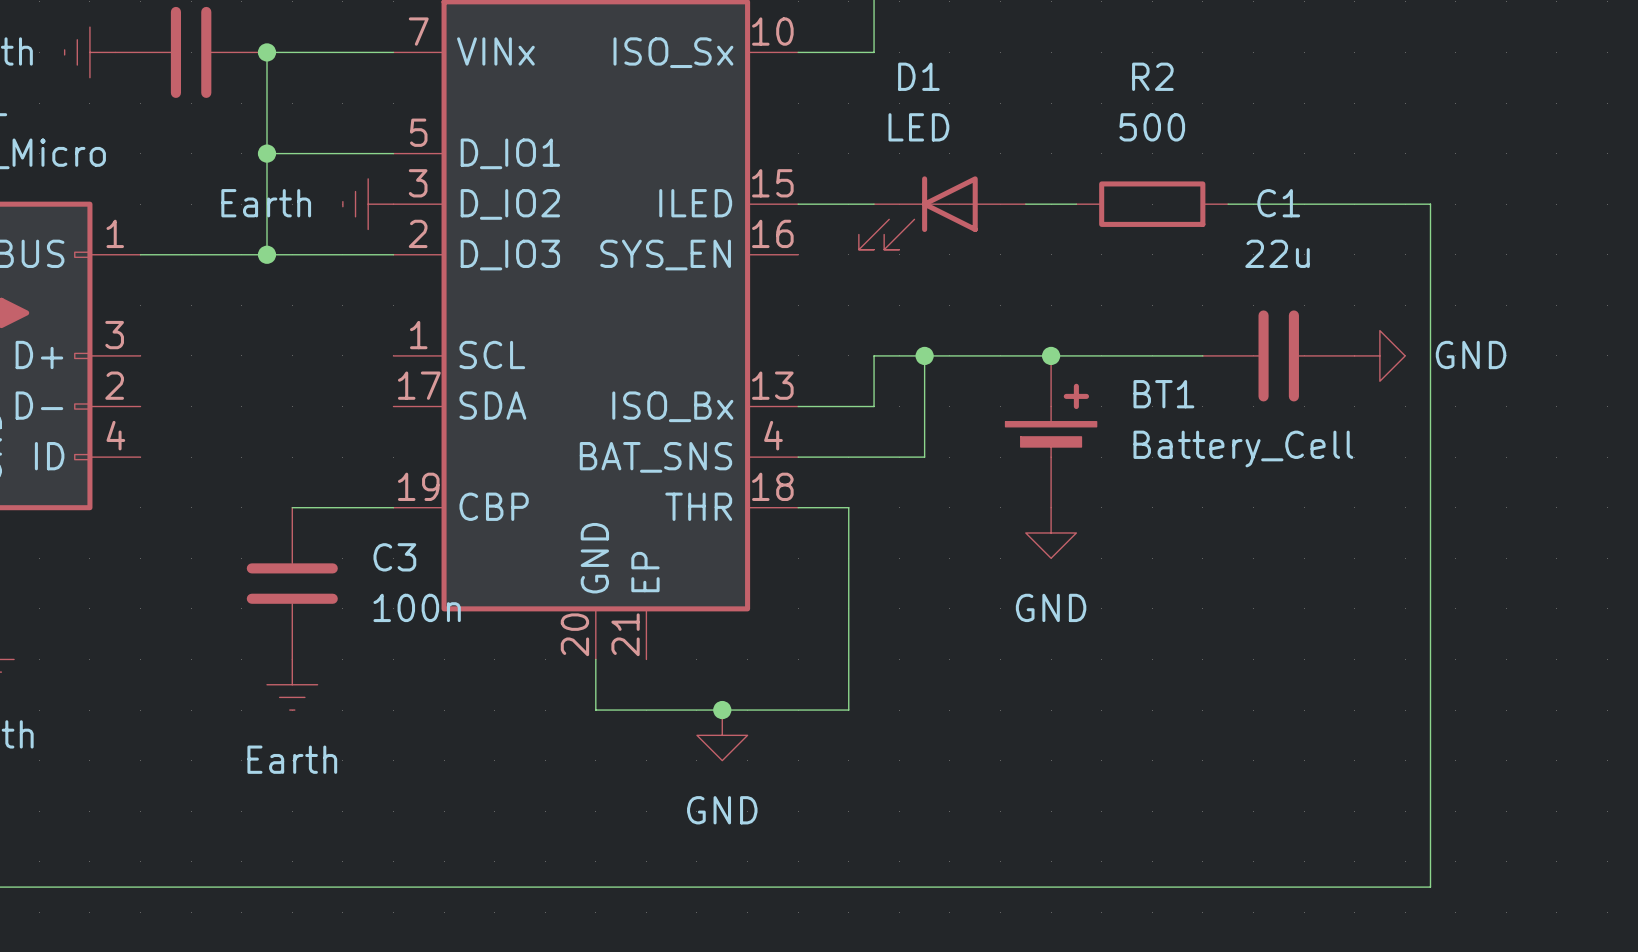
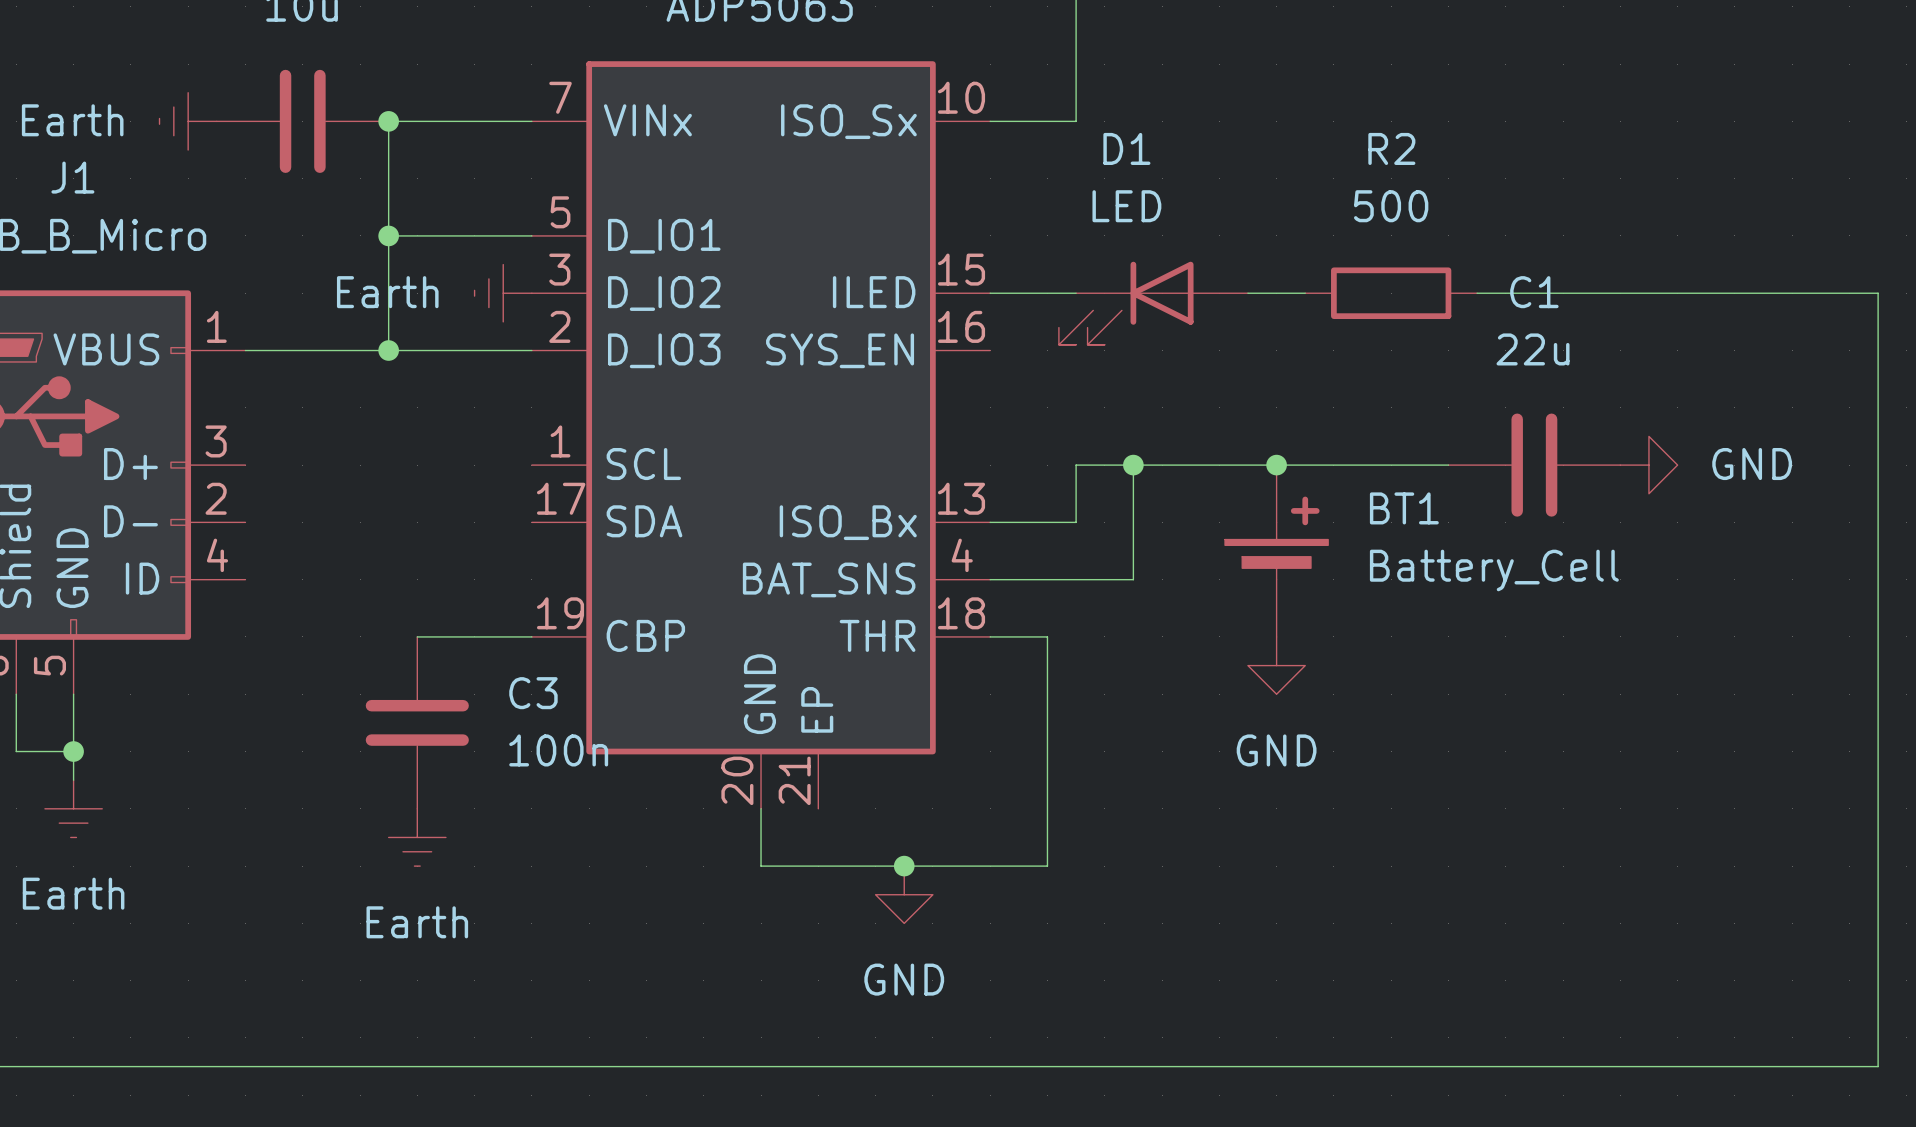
wire: (1430, 204) (1430, 887) -> (1706, 293) (1878, 293) (1878, 1066) (1706, 1066)

